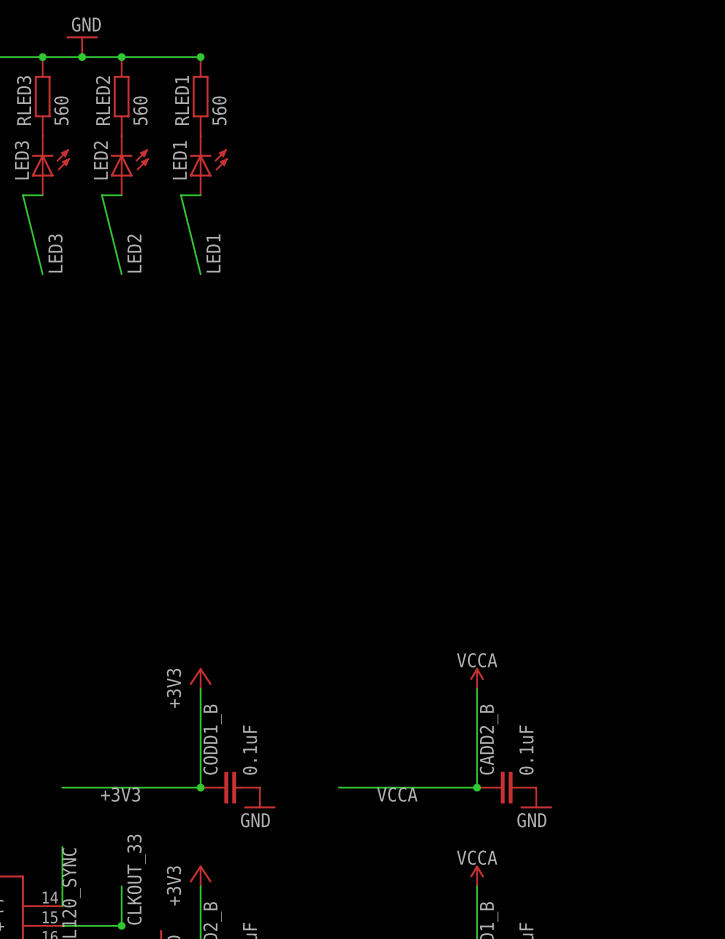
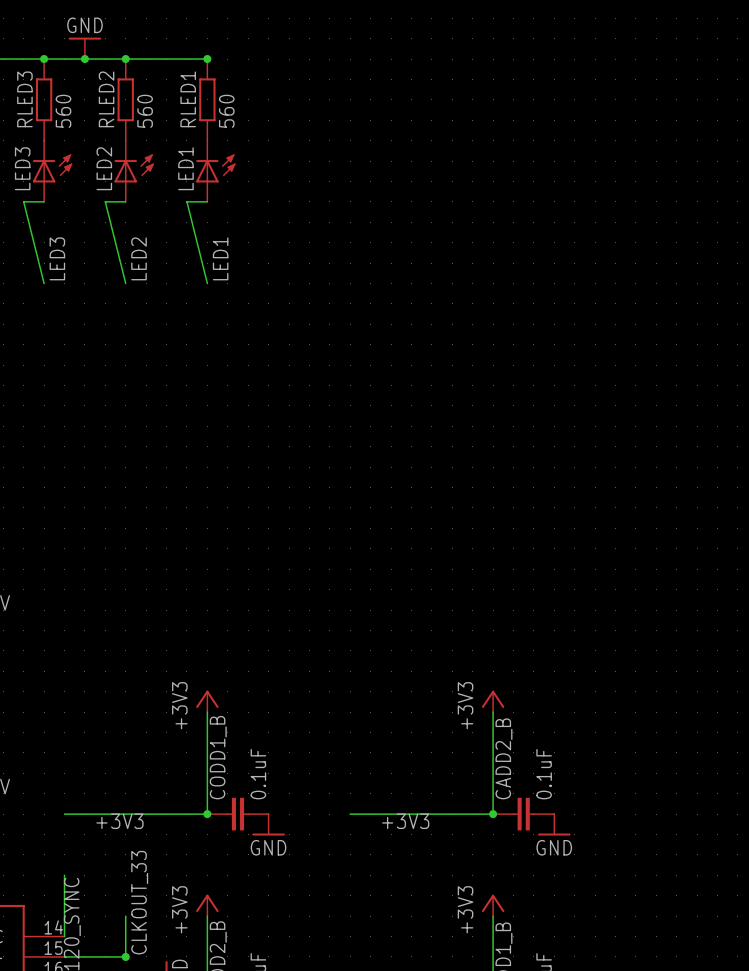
power symbol: VCCA (477, 678) -> +3V3 (493, 701)
label: VCCA (397, 794) -> +3V3 (405, 821)
power symbol: VCCA (477, 876) -> +3V3 (493, 905)

